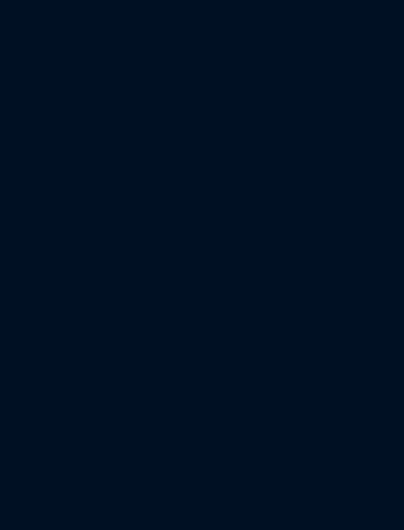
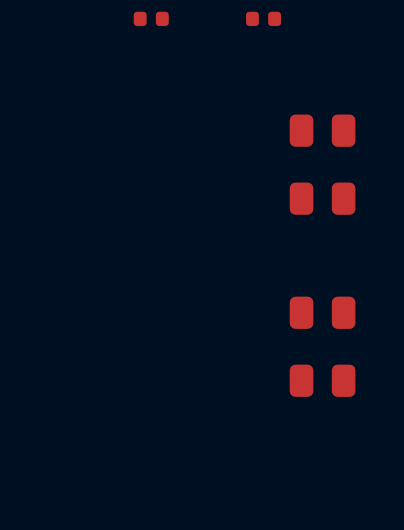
part: none -> (151, 18)
part: none -> (263, 18)
part: none -> (322, 130)
part: none -> (322, 198)
part: none -> (322, 312)
part: none -> (322, 380)

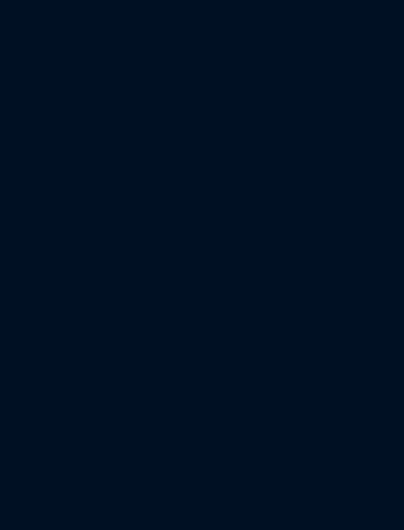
part: (151, 18) -> none
part: (263, 18) -> none
part: (322, 130) -> none
part: (322, 198) -> none
part: (322, 312) -> none
part: (322, 380) -> none

